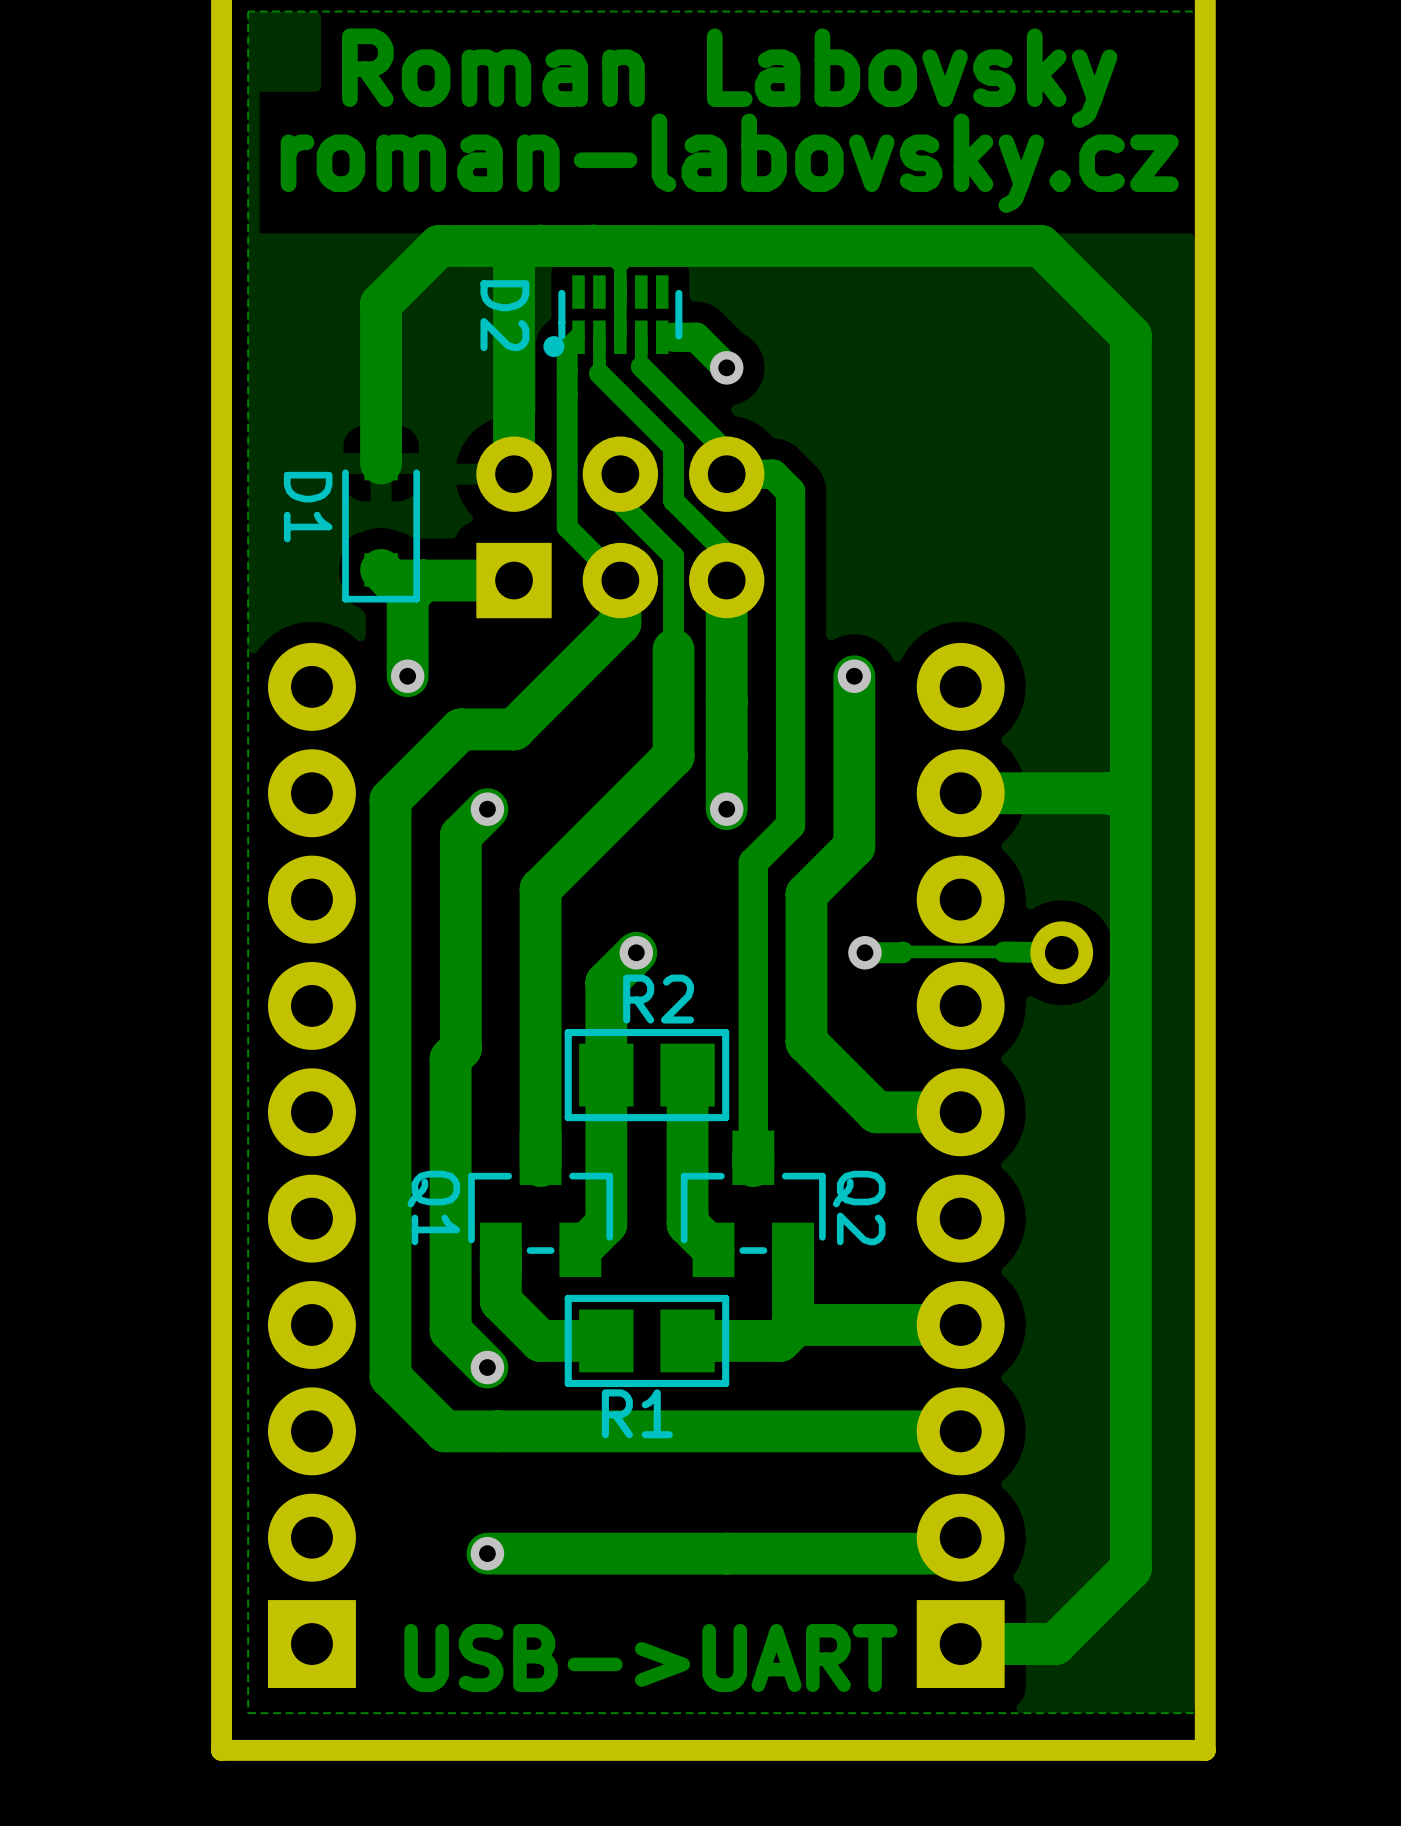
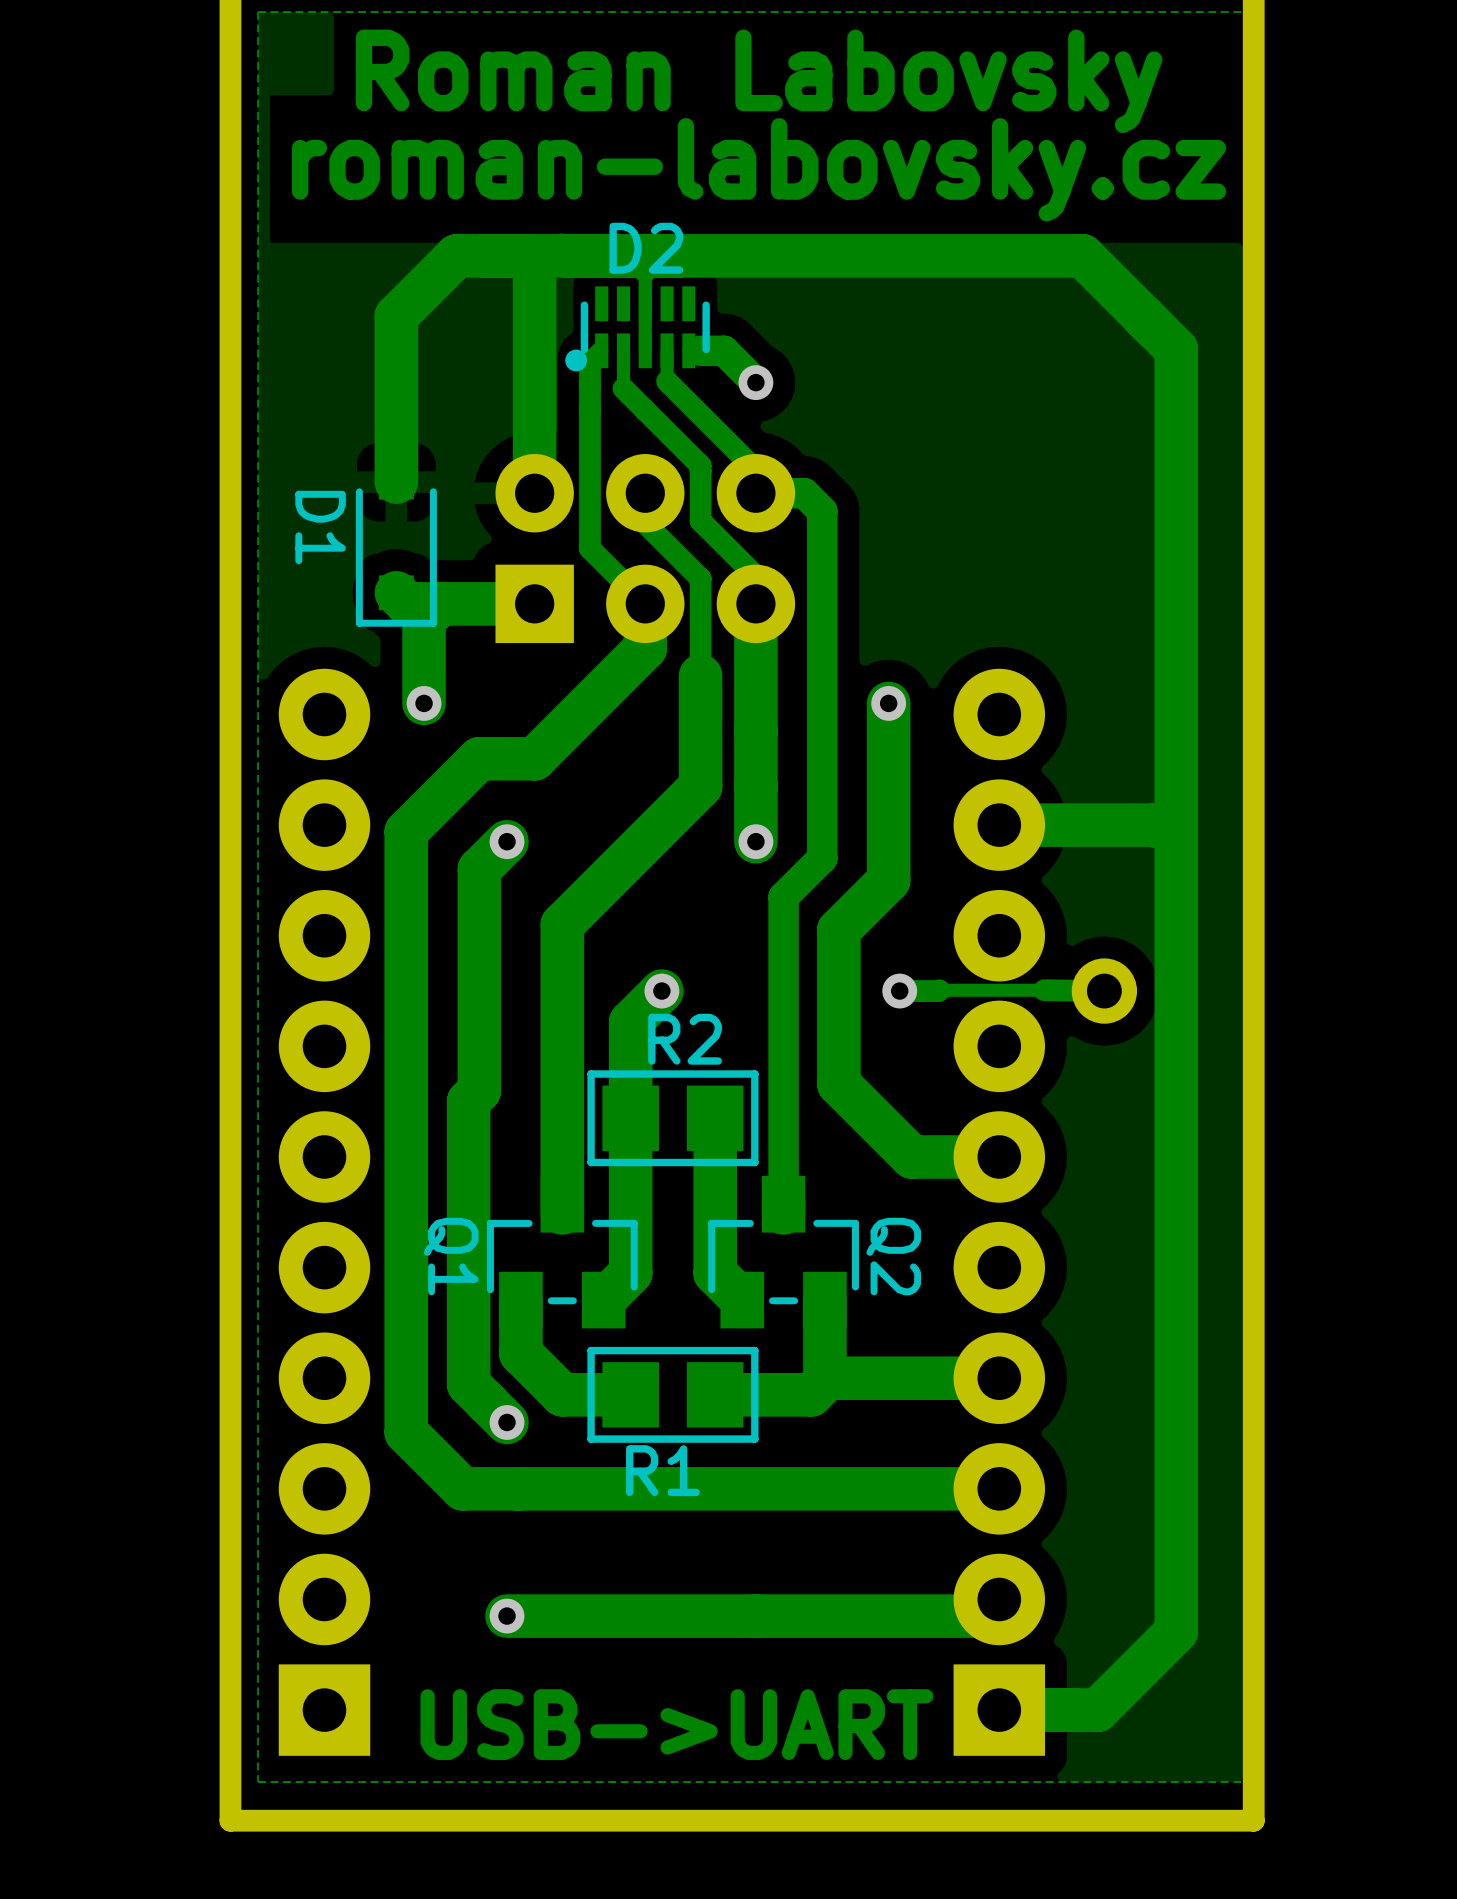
D2 name rotation: 0° (504, 315) -> 90° counterclockwise (646, 248)
D2 name position: D2 (504, 315) -> D2 (646, 248)

